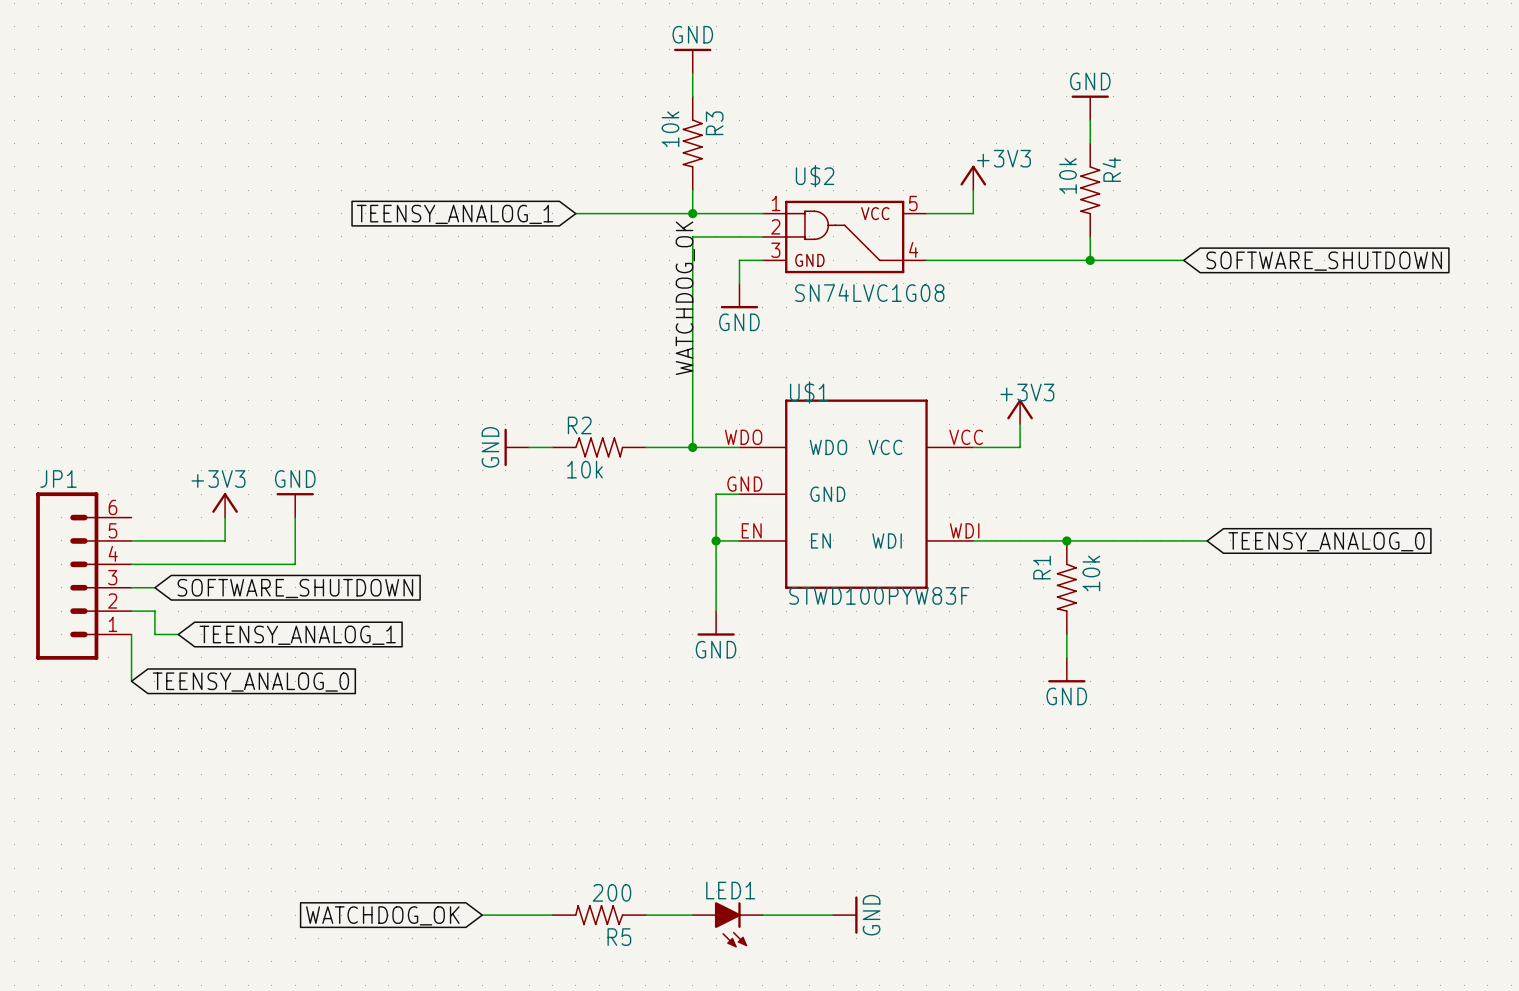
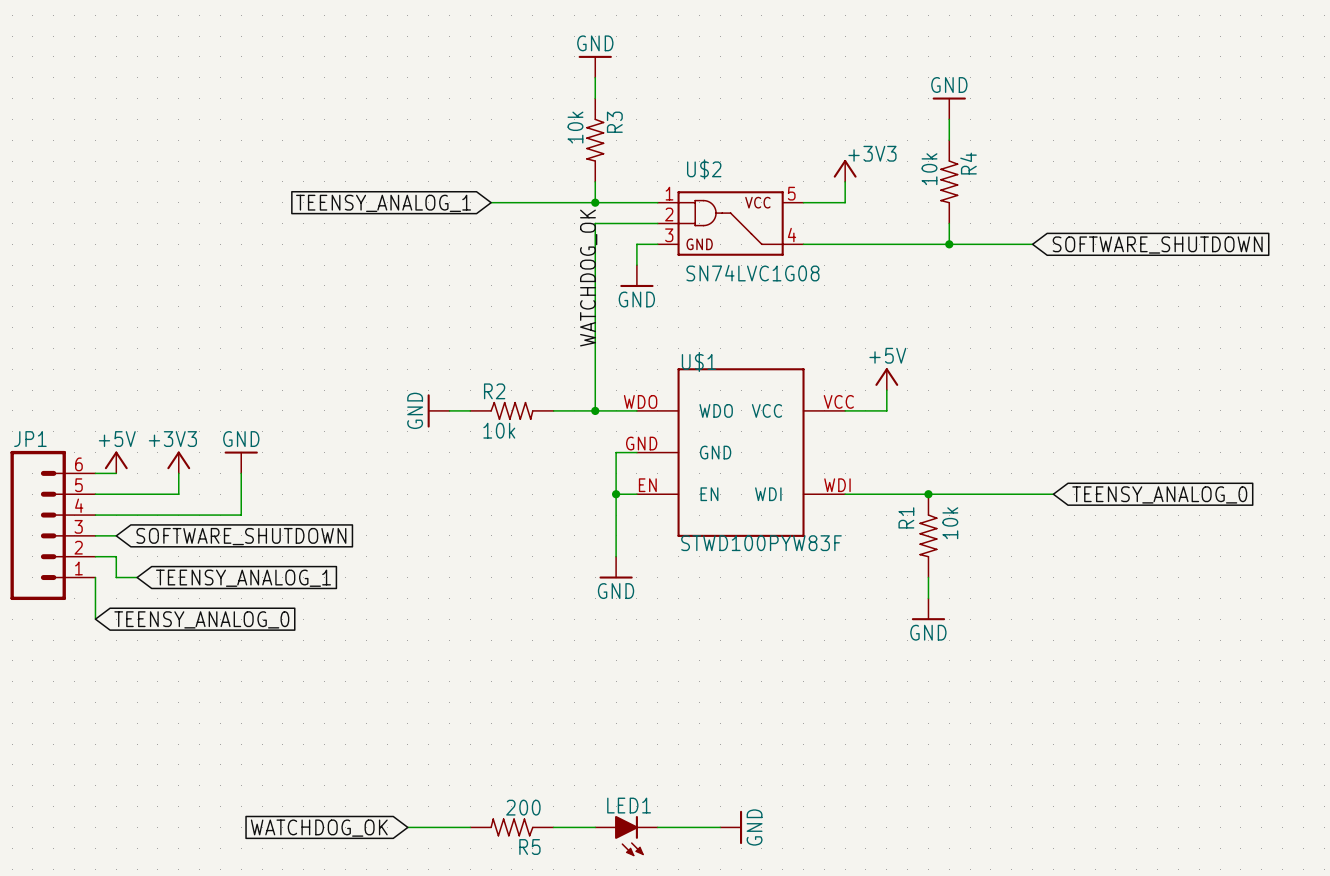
power symbol: +3V3 (1020, 411) -> +5V (886, 379)
power symbol: none -> +5V (116, 462)
wire: none -> (95, 473) (116, 473)

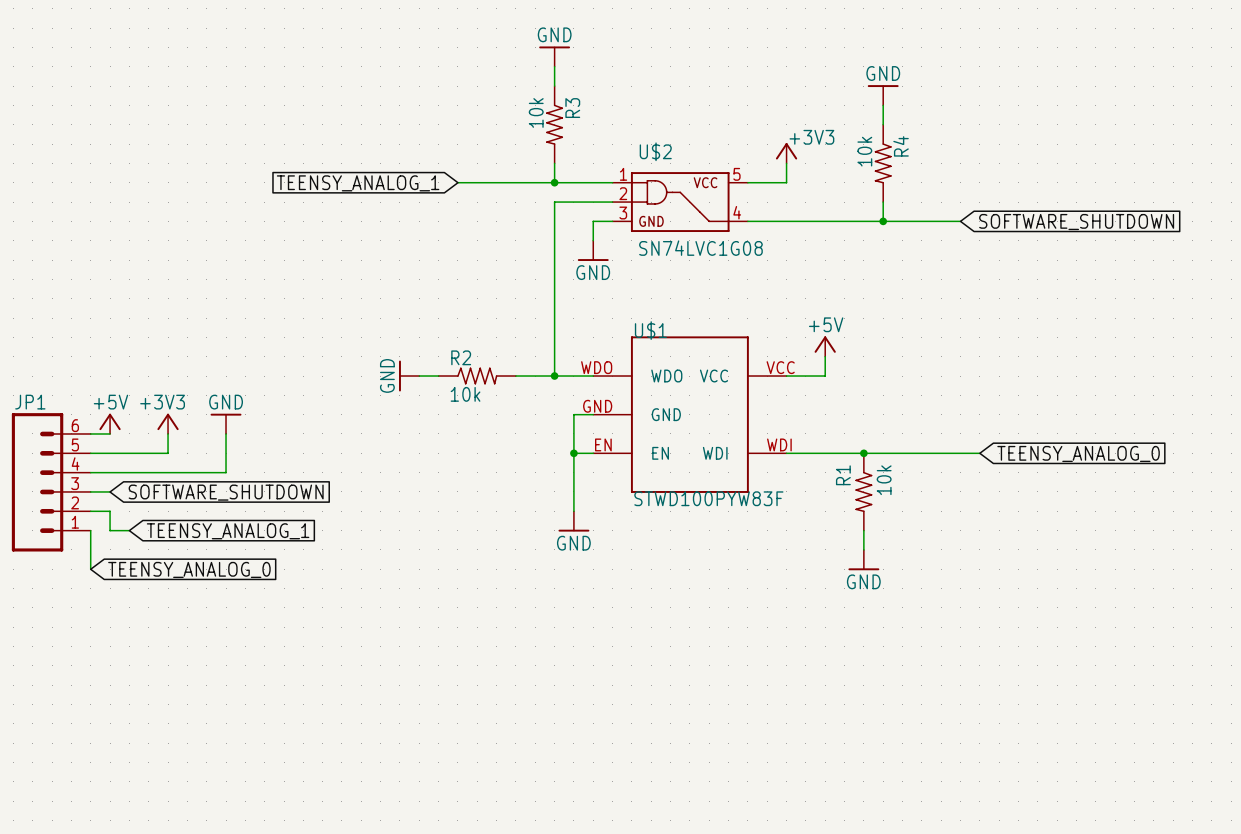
label: WATCHDOG_OK (588, 278) -> none
wire: (407, 827) (470, 827) -> none
R5: 200 (511, 827) -> none
wire: (553, 827) (595, 827) -> none
wire: (657, 827) (720, 827) -> none
power symbol: GND (731, 827) -> none
global label: WATCHDOG_OK (319, 828) -> none
LED1: (626, 836) -> none

